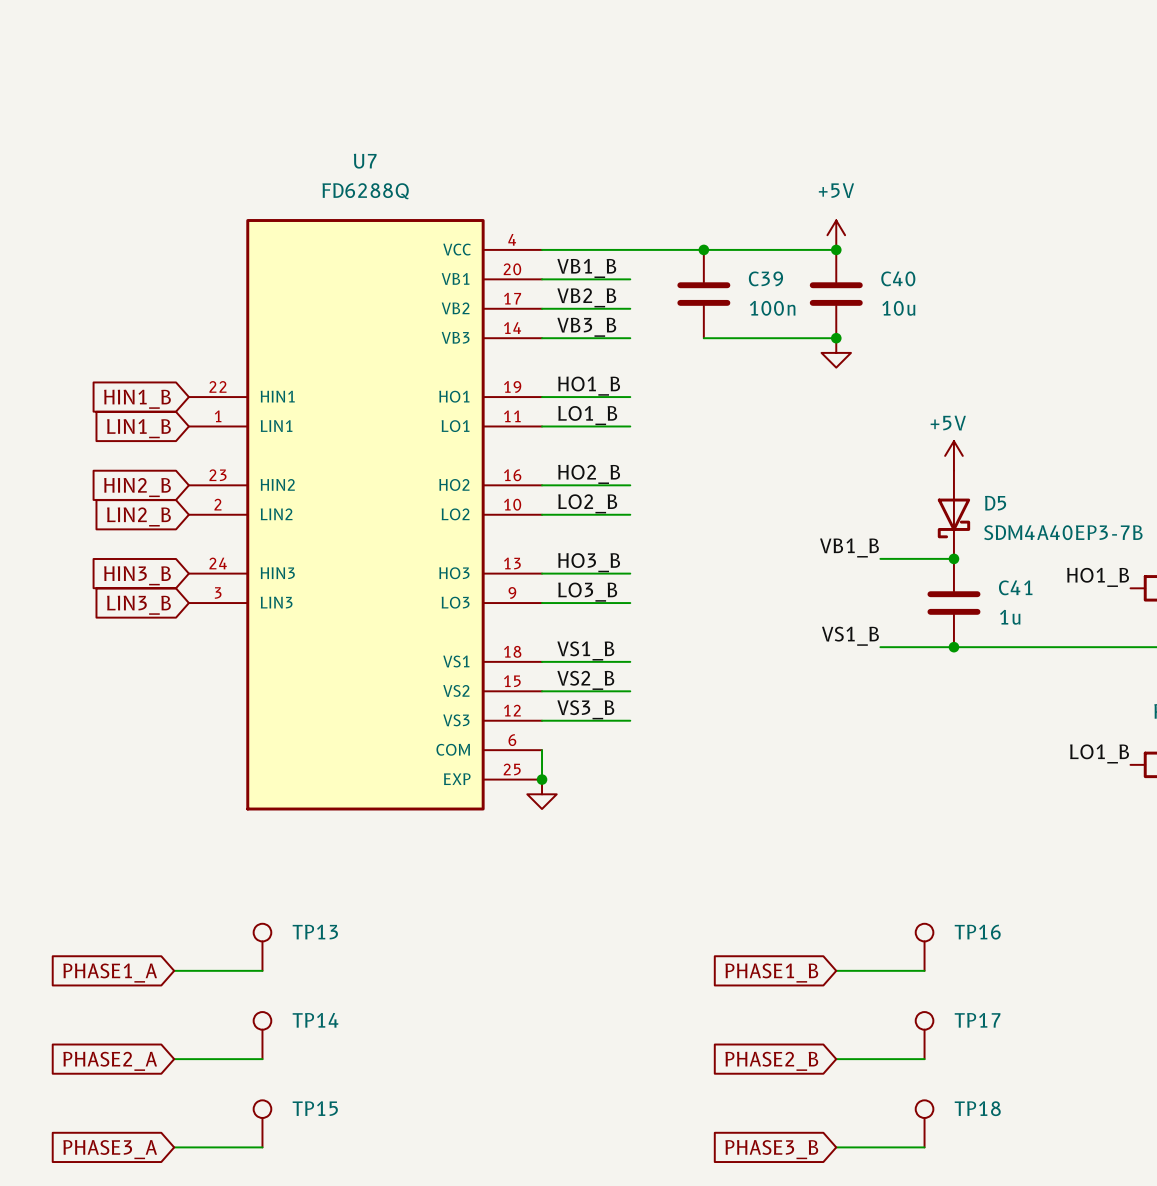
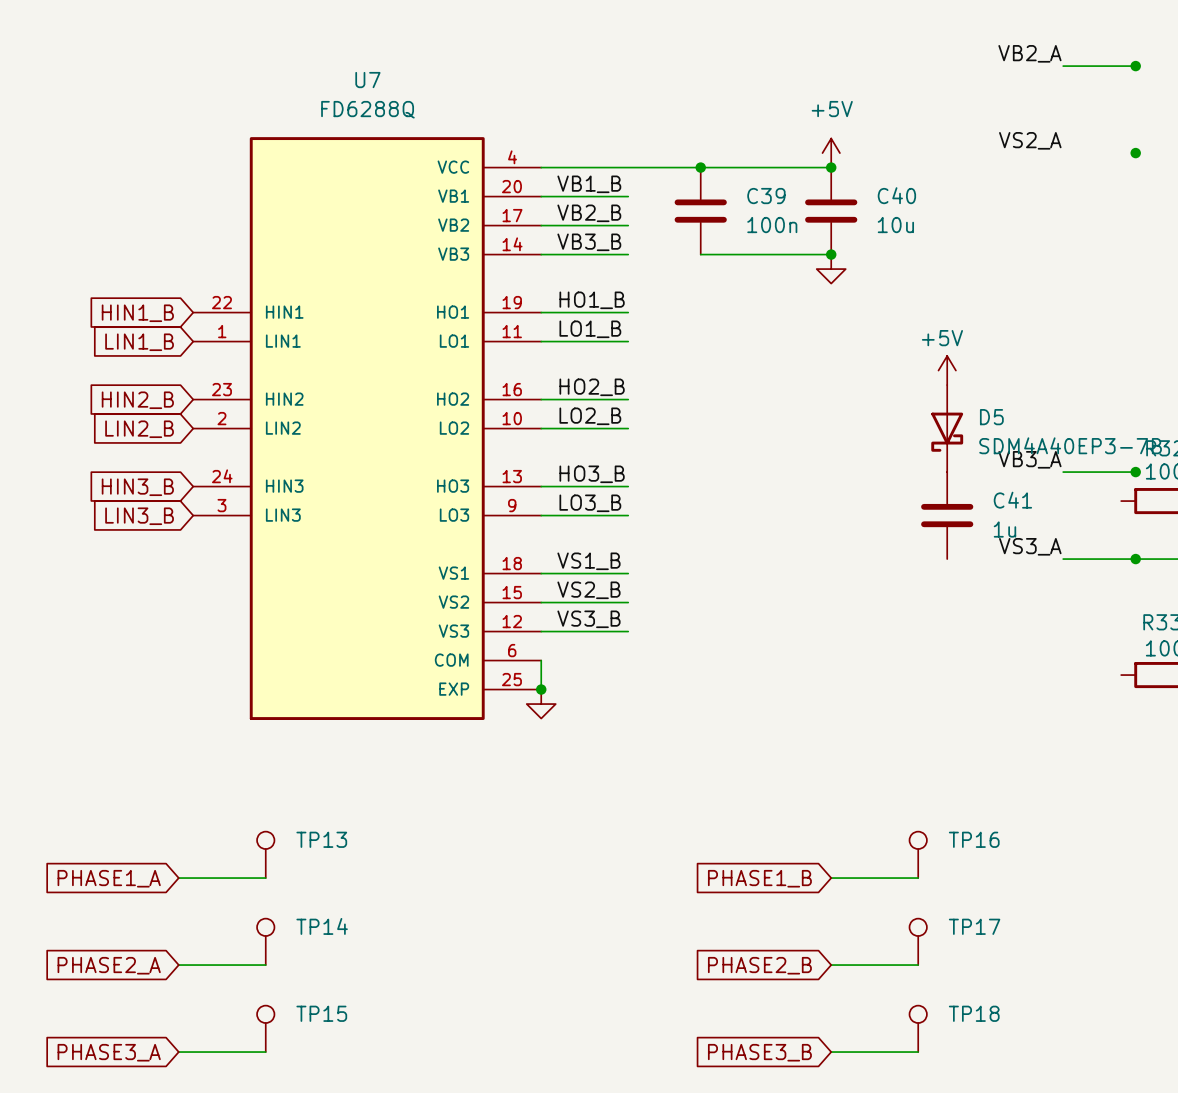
label: none -> VB2_A (1029, 53)
wire: none -> (1063, 66) (1135, 66)
junction: none -> (1135, 66)
label: none -> VS2_A (1030, 140)
junction: none -> (1135, 153)
label: VB1_B (849, 547) -> none
label: none -> VB3_A (1029, 459)
wire: (880, 558) (953, 558) -> (1063, 472) (1135, 472)
junction: (953, 558) -> none
junction: none -> (1135, 472)
label: HO1_B (1098, 577) -> none
label: VS1_B (850, 636) -> none
label: none -> VS3_A (1030, 546)
wire: (880, 647) (1071, 647) -> none
junction: (953, 647) -> none
junction: none -> (1135, 559)
label: LO1_B (1099, 753) -> none

